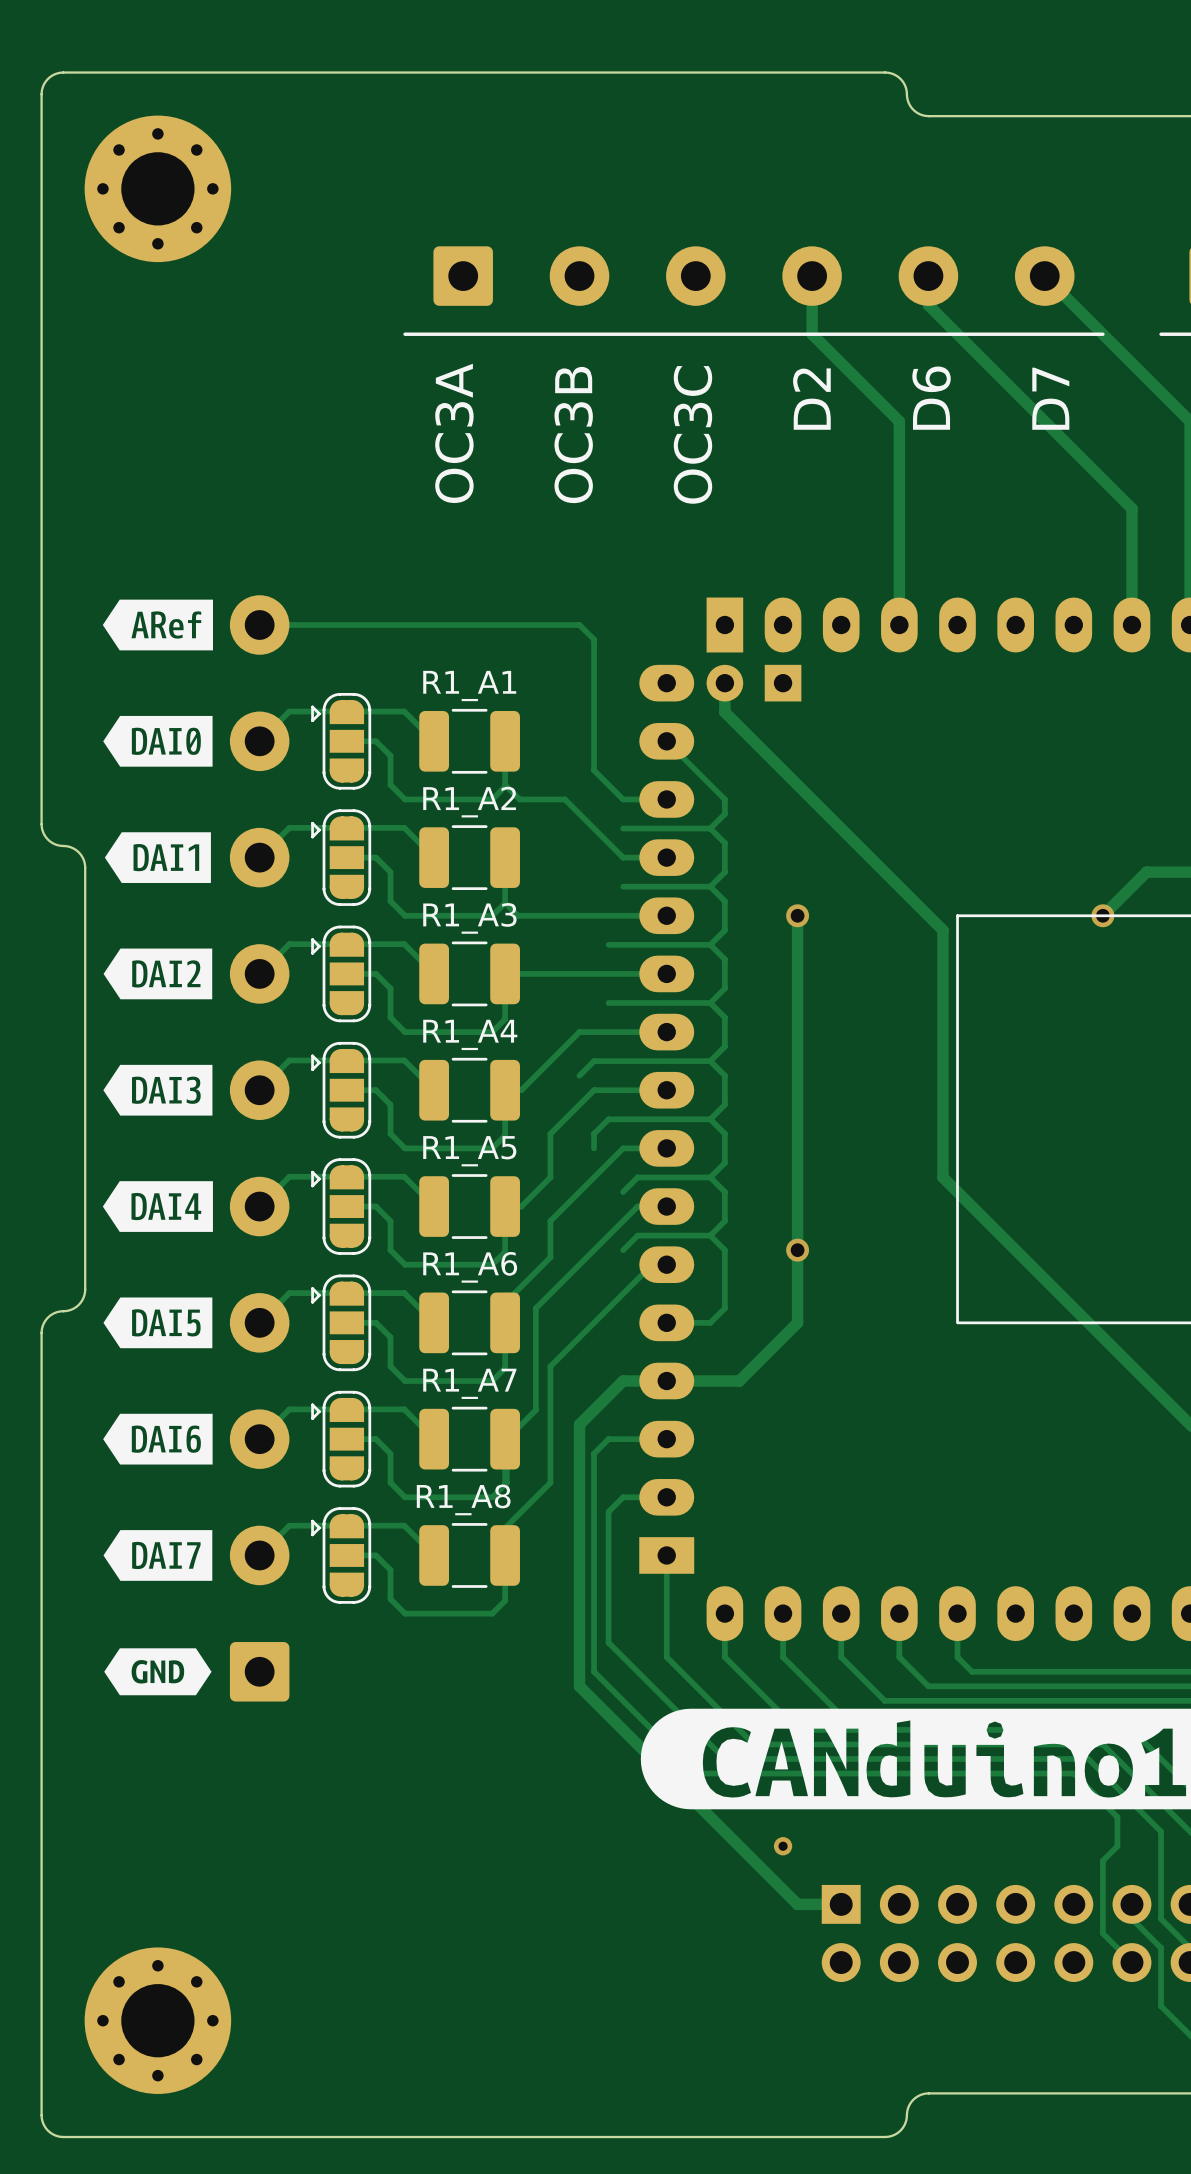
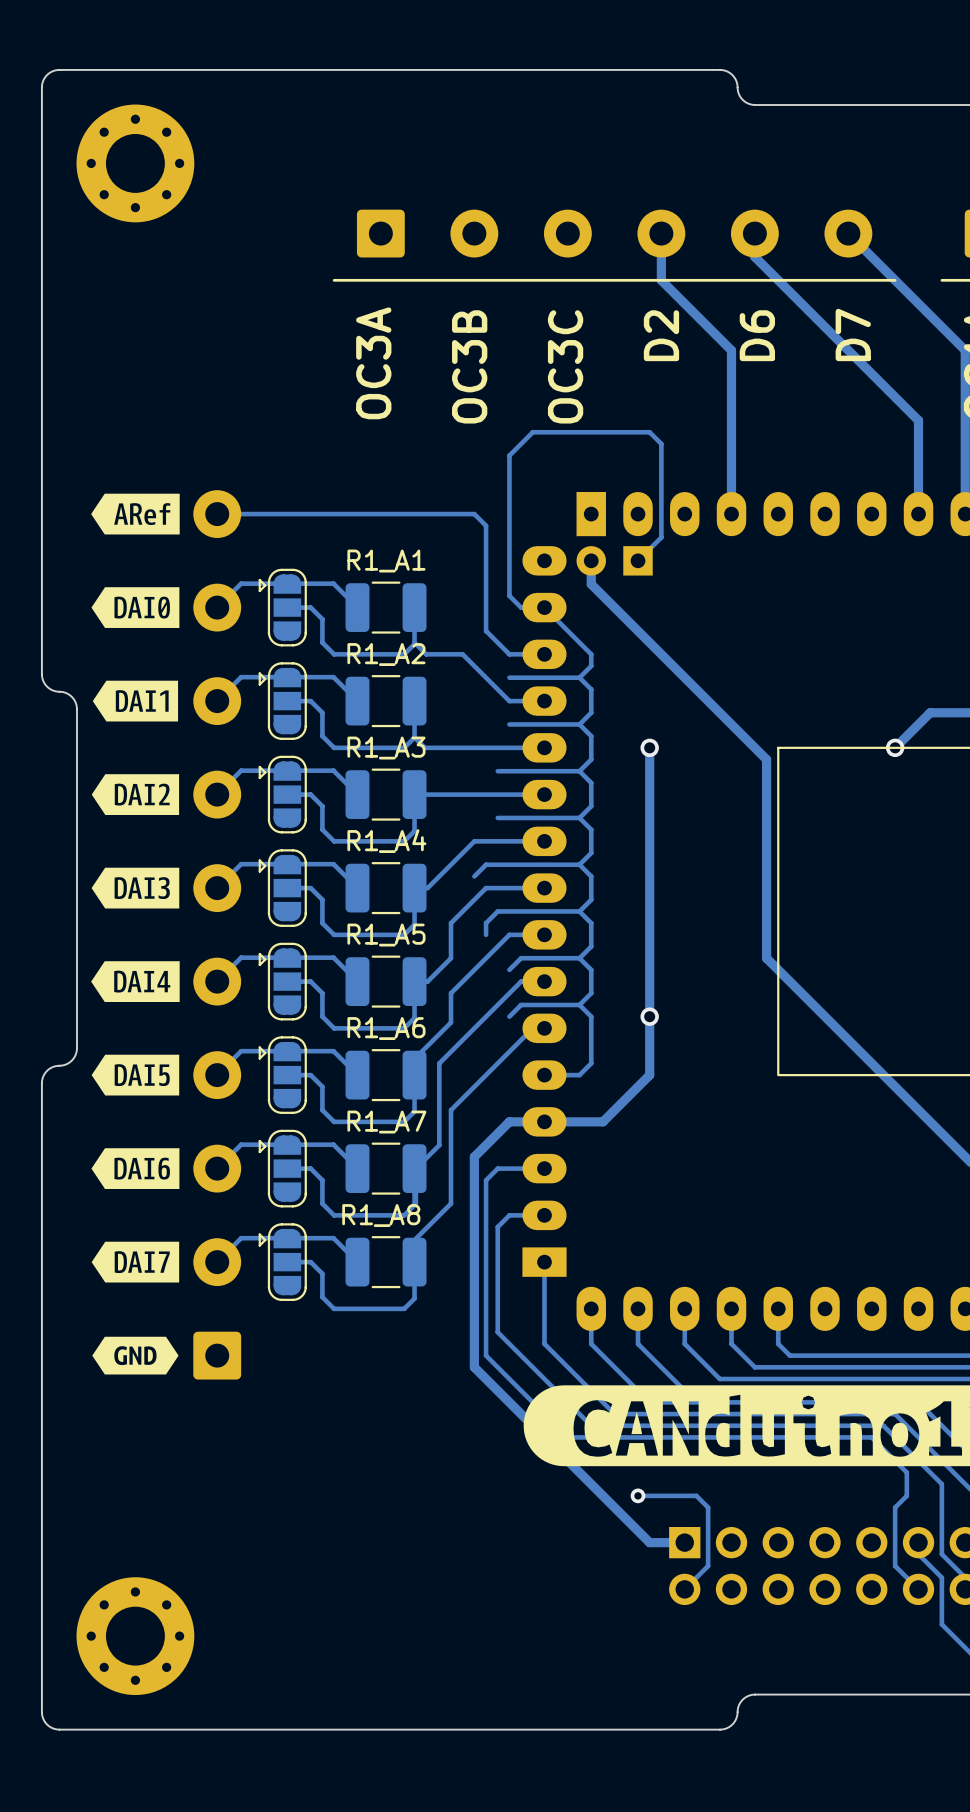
track: none -> (638, 560) (661, 537) (661, 443) (649, 432) (532, 432) (509, 455) (509, 595) (521, 607) (544, 607)
track: none -> (638, 1495) (696, 1495) (708, 1507) (708, 1566) (684, 1589)

